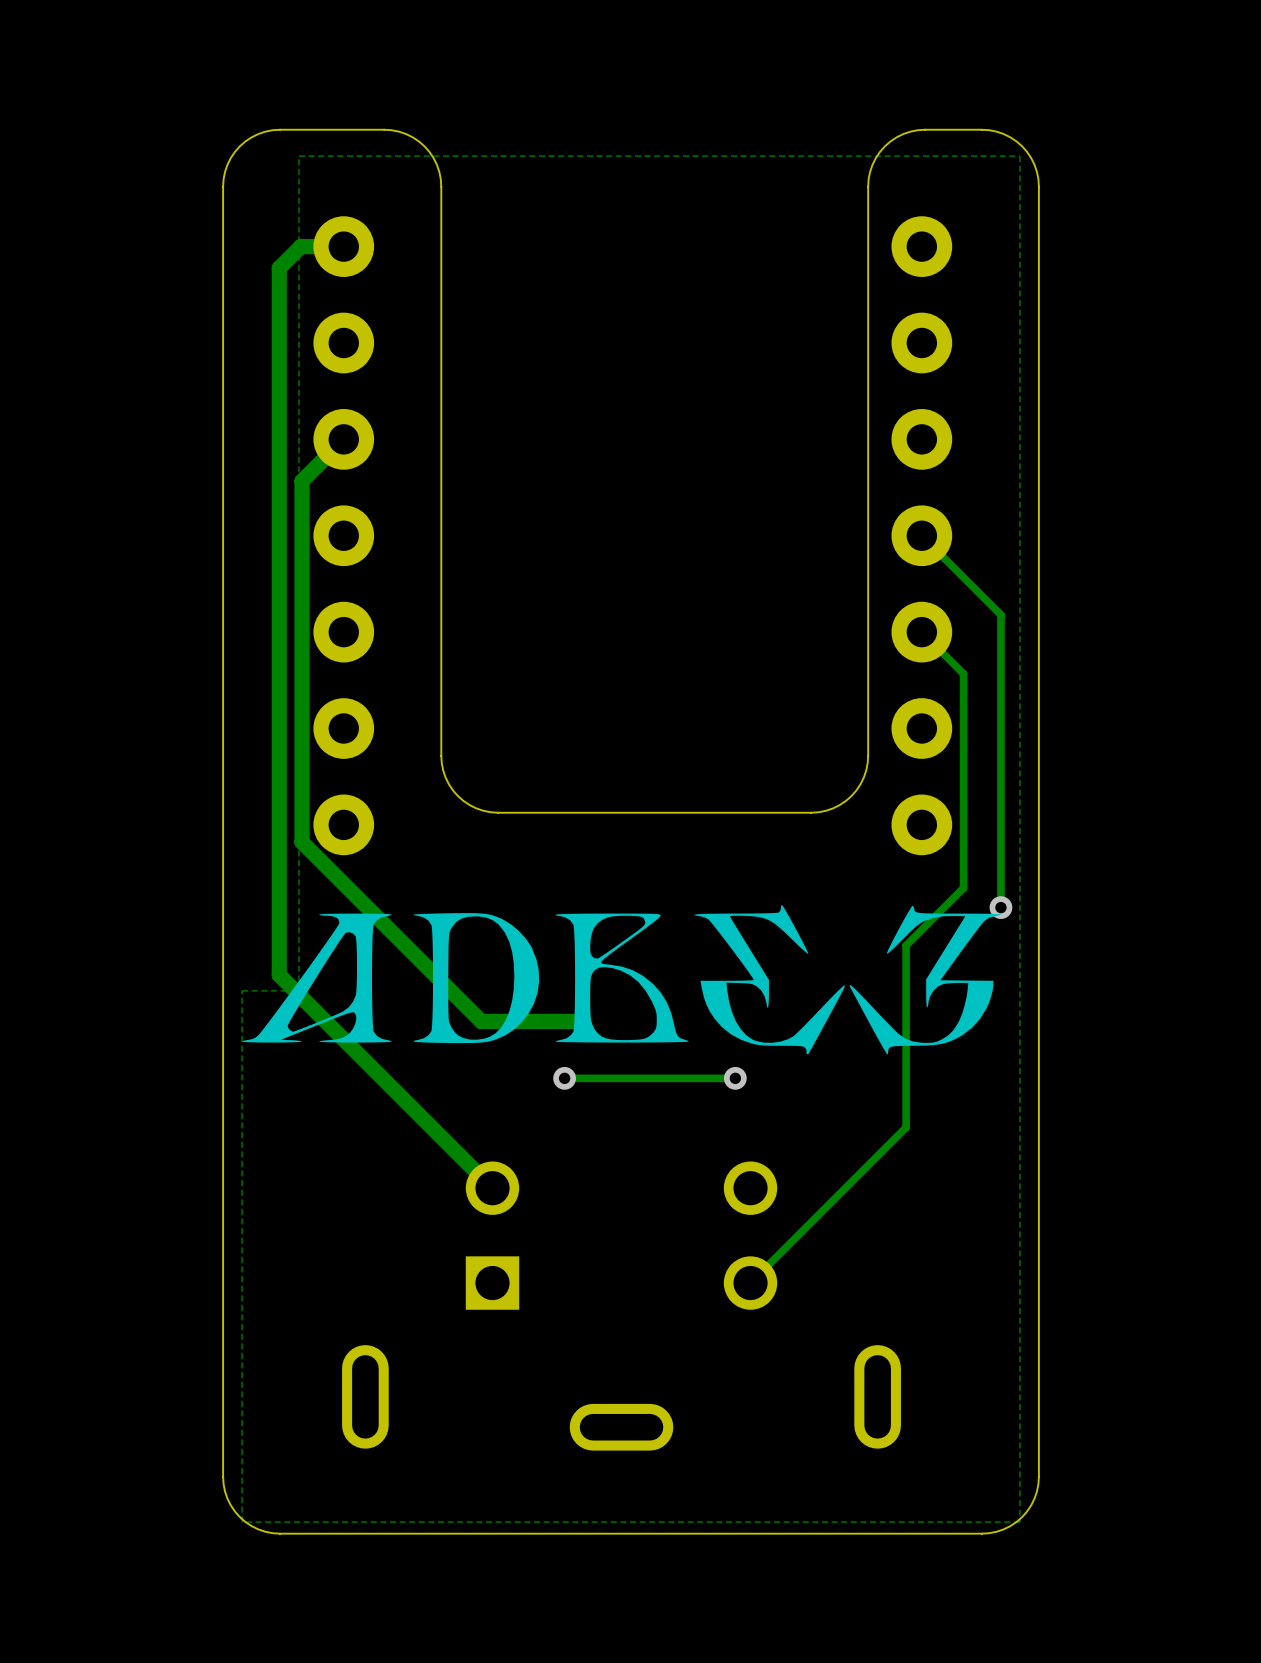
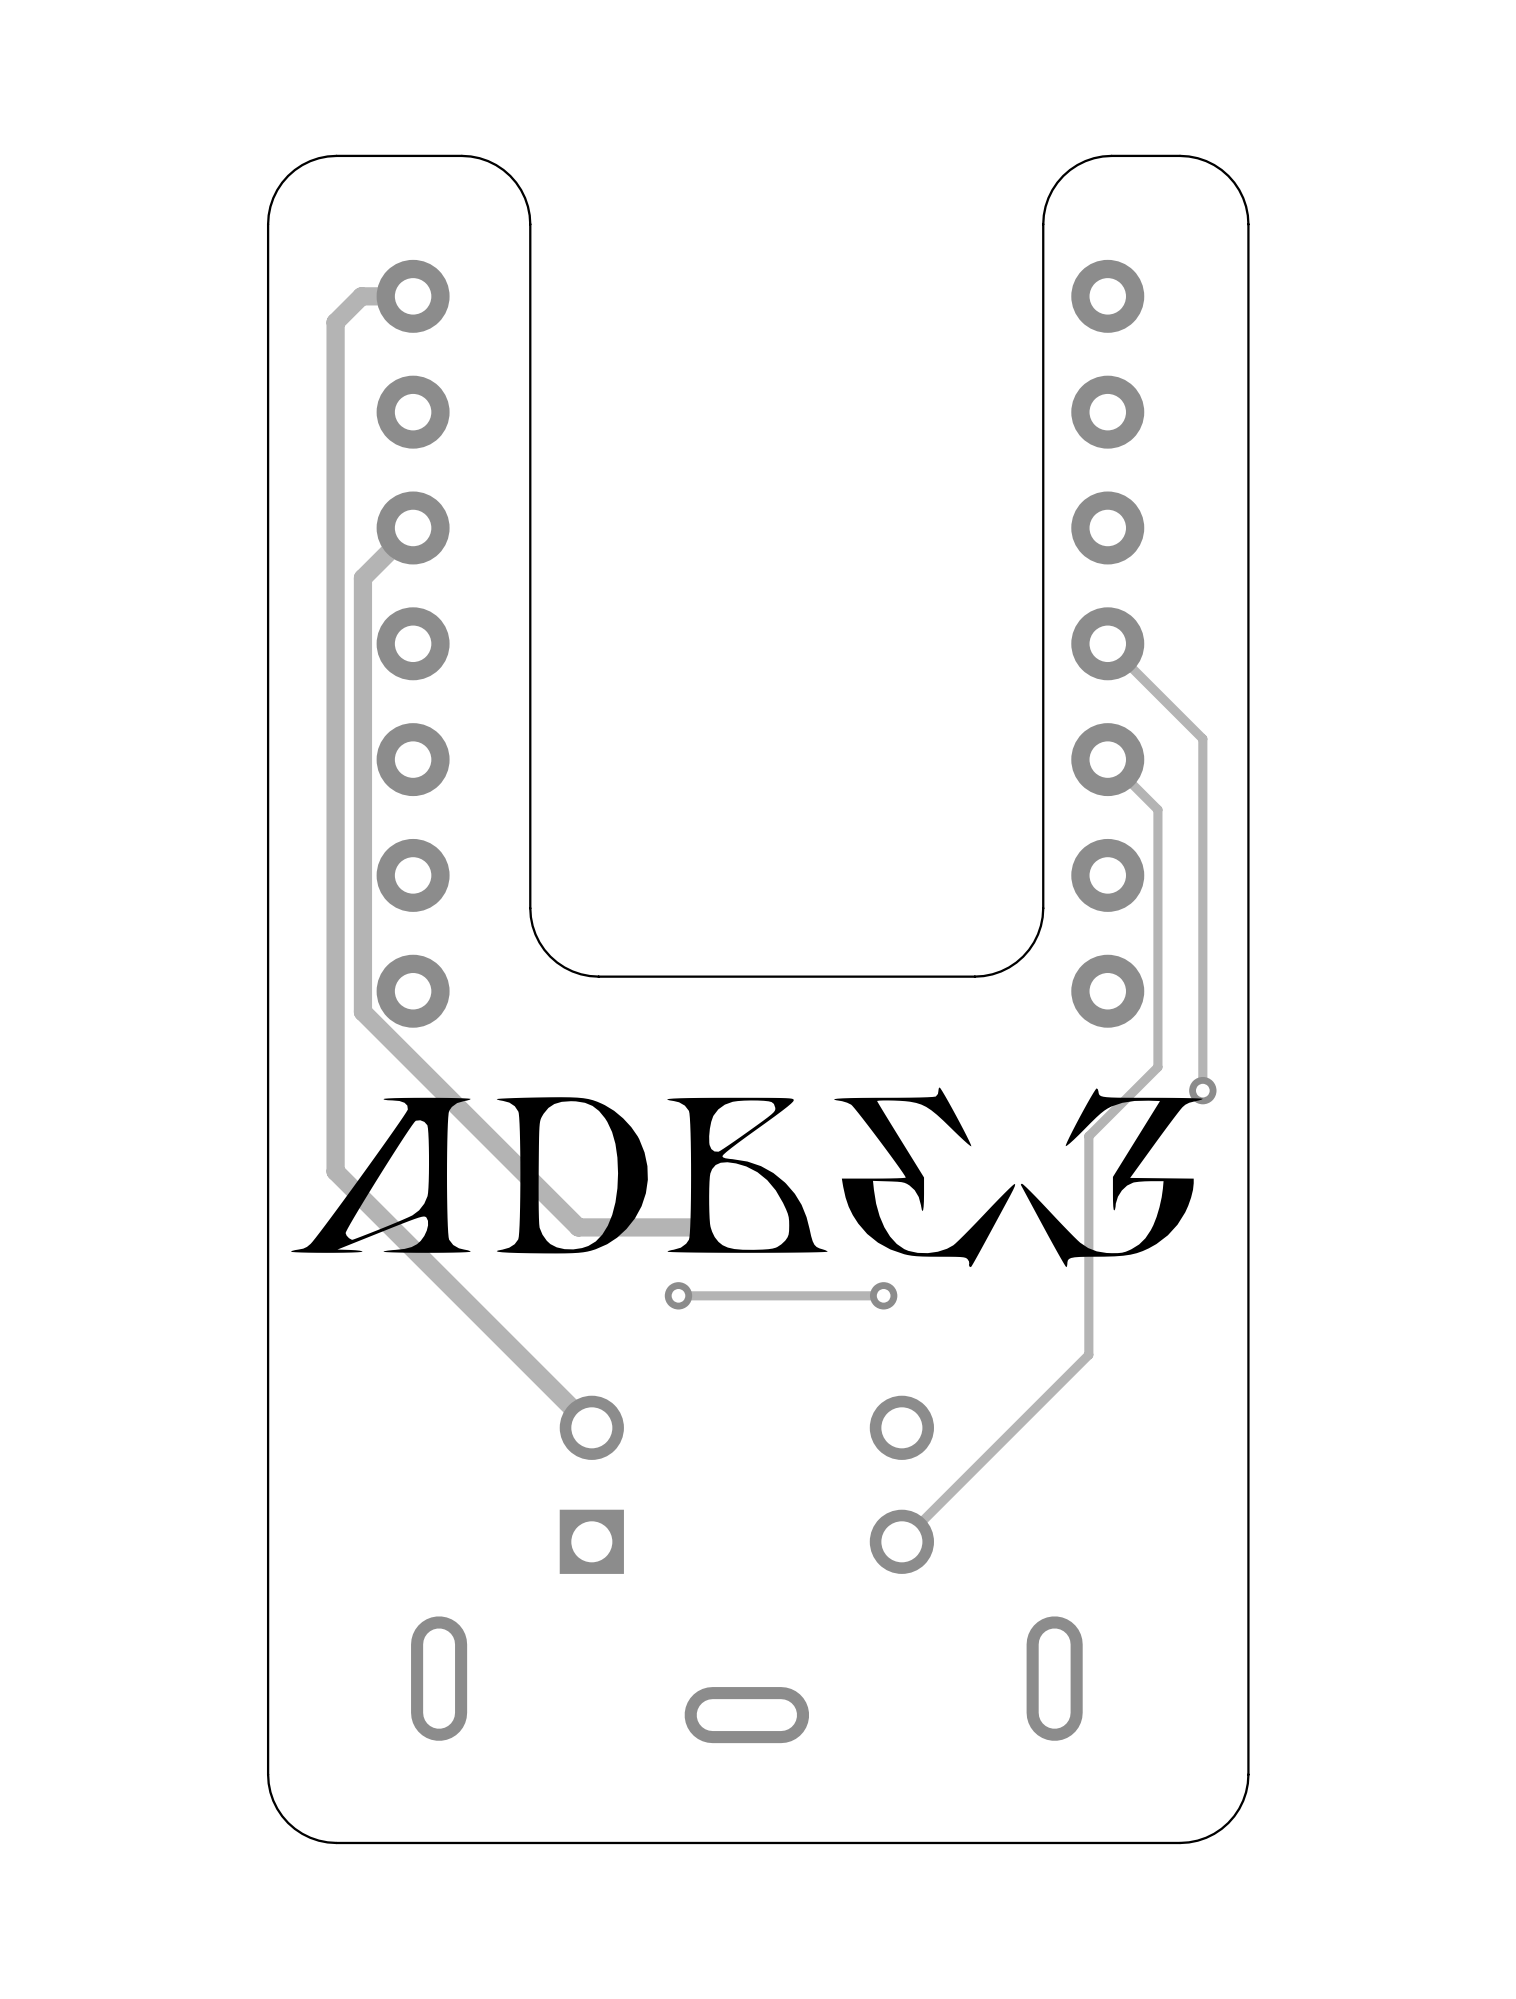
zone outline: (1019, 156) (1019, 1522) (242, 1522) (242, 990) (298, 990) (298, 156) (1019, 156) -> none

